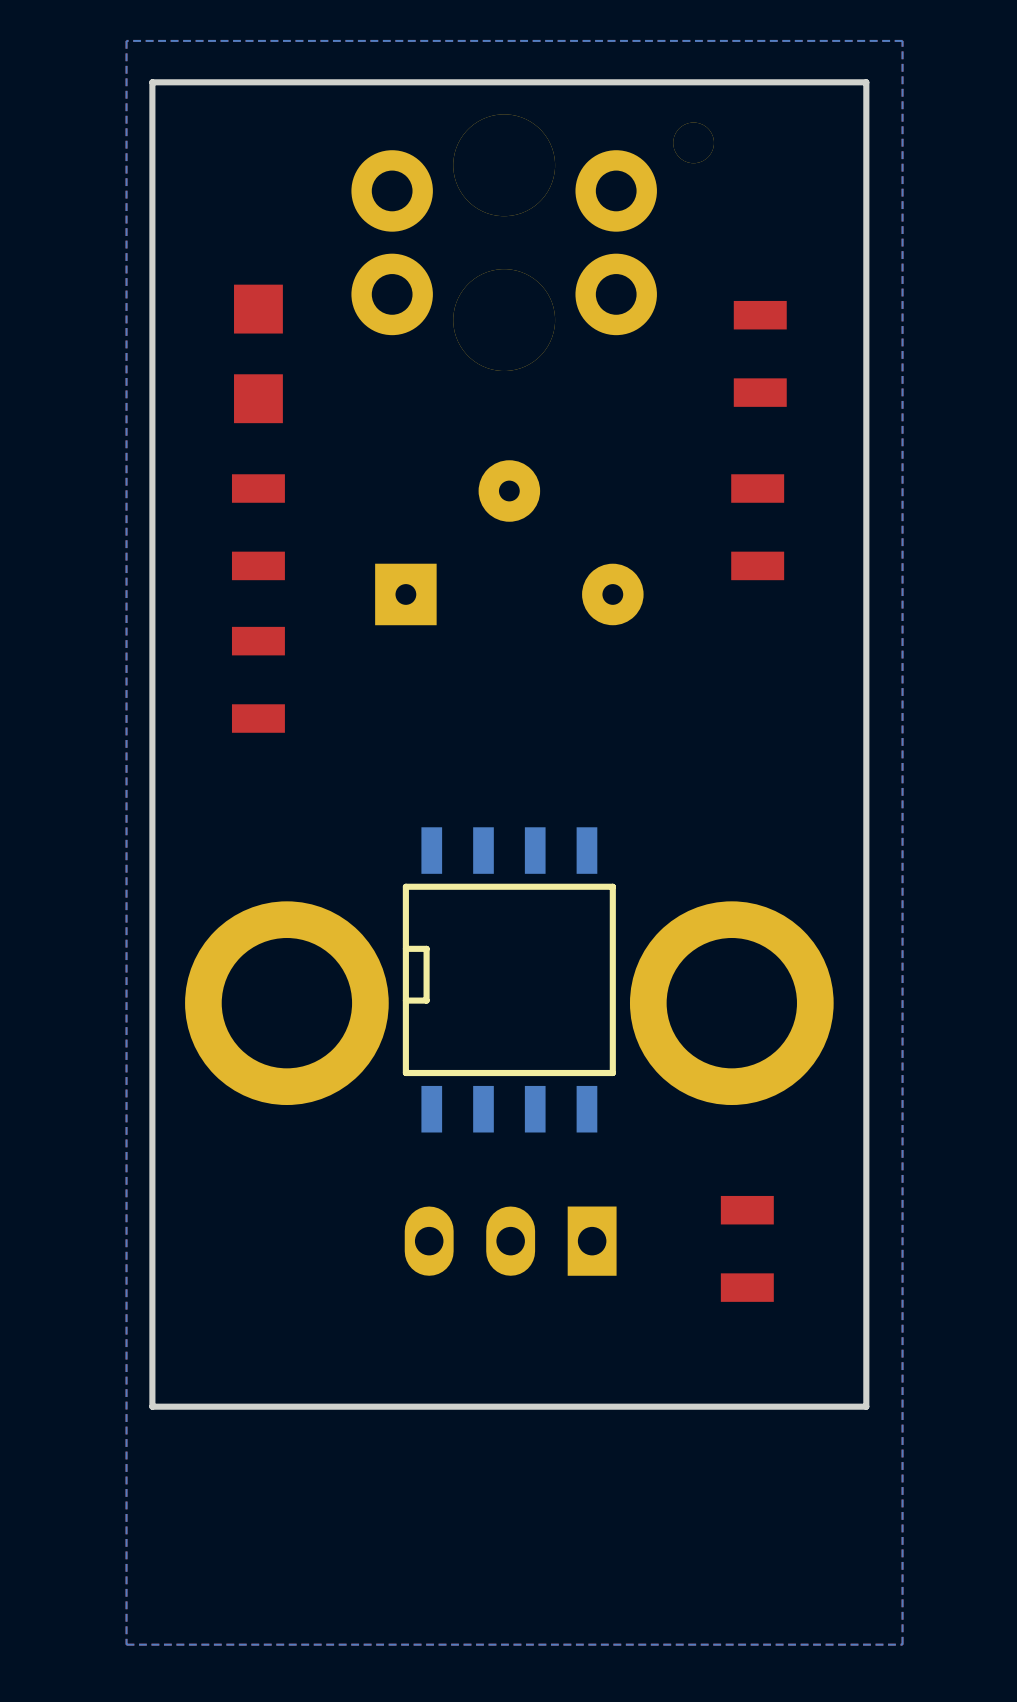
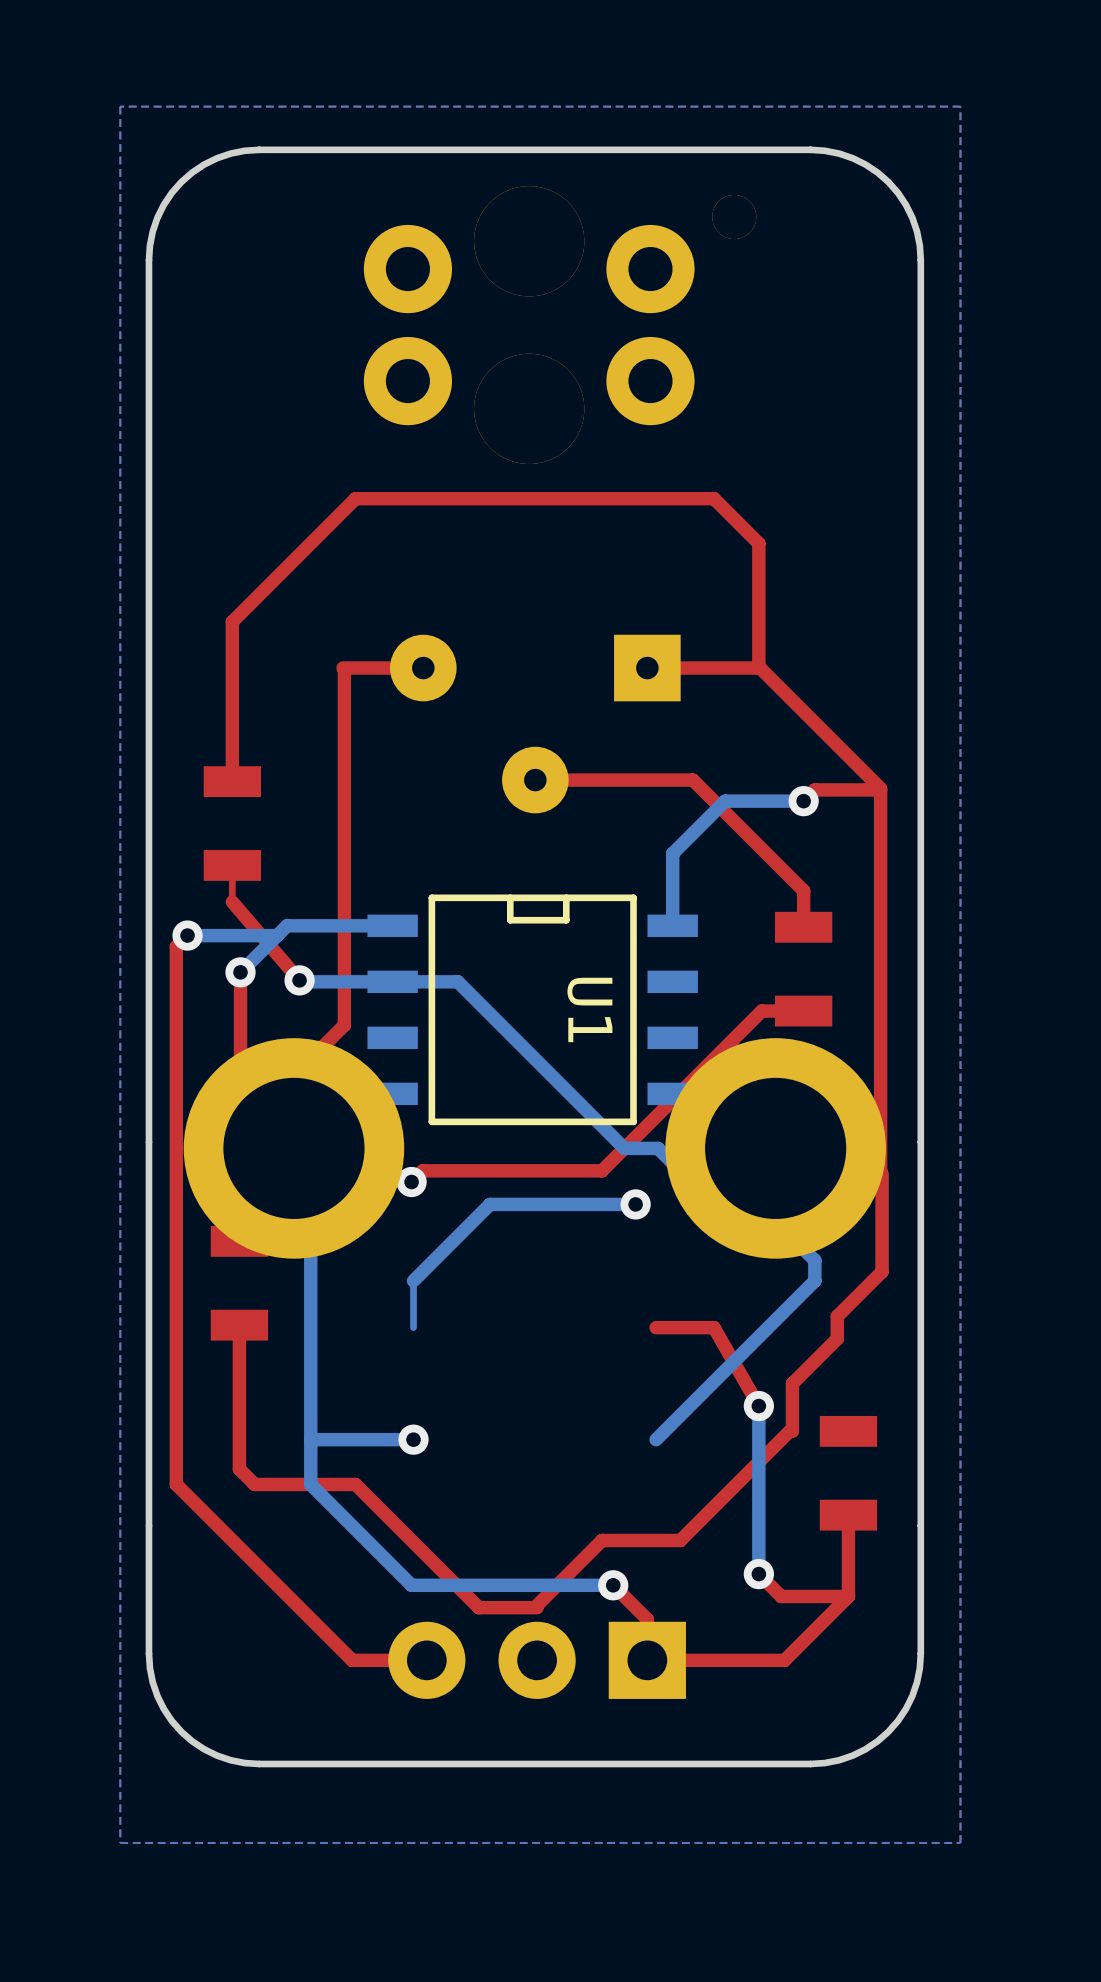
board edge: (866, 82) (866, 1406) (152, 1406) (152, 82) (866, 82) -> (810, 149) (839, 153) (852, 158) (877, 172) (898, 192) (906, 204) (912, 217) (919, 245) (920, 1653) (919, 1668) (912, 1695) (898, 1720) (877, 1741) (852, 1755) (824, 1763) (259, 1764) (244, 1763) (217, 1755) (192, 1741) (171, 1720) (157, 1695) (149, 1668) (148, 1653) (148, 260) (149, 245) (157, 217) (171, 192) (192, 172) (217, 158) (244, 150) (810, 149)
part: (258, 353) -> none
part: (760, 353) -> none
part: (258, 527) -> none
part: (757, 527) -> none
part rotation: 0° (509, 542) -> 180° (535, 724)
top track: none -> (423, 668) (343, 668) (344, 1025) (310, 1058) (310, 1159) (333, 1182) (377, 1137)
top track: none -> (758, 668) (758, 543) (714, 498) (355, 498) (232, 621) (232, 781)
top track: none -> (758, 668) (647, 668)
top track: none -> (758, 668) (880, 789)
top track: none -> (535, 780) (692, 780) (803, 890) (803, 927)
top track: none -> (880, 789) (814, 789) (803, 801)
top track: none -> (880, 789) (880, 1172)
part position: (258, 679) -> (232, 823)
bottom track: none -> (803, 801) (725, 801) (672, 853) (672, 925)
via: none -> (803, 801)
top track: none -> (232, 865) (232, 901) (299, 980)
bottom track: none -> (392, 925) (287, 925) (240, 972)
top track: none -> (187, 935) (176, 946) (176, 1484) (352, 1660) (426, 1660)
via: none -> (187, 935)
bottom track: none -> (277, 935) (187, 935)
part: none -> (803, 969)
top track: none -> (240, 972) (240, 1062)
via: none -> (240, 972)
bottom track: none -> (299, 980) (457, 981) (624, 1148) (658, 1148) (736, 1226) (781, 1226) (814, 1260) (814, 1280) (656, 1439)
via: none -> (299, 980)
U1: none -> (532, 1009)
top track: none -> (803, 1011) (761, 1011) (602, 1170) (422, 1170) (411, 1182)
part: (509, 979) -> none
top track: none -> (880, 1172) (882, 1271) (837, 1316) (837, 1338) (792, 1383) (792, 1431) (789, 1431) (680, 1540) (602, 1540) (537, 1605) (537, 1607) (478, 1607) (355, 1484) (254, 1484) (239, 1469) (239, 1325)
via: none -> (411, 1182)
bottom track: none -> (333, 1204) (310, 1226) (310, 1484) (411, 1585) (613, 1585)
bottom track: none -> (635, 1204) (490, 1204) (413, 1280) (413, 1327)
via: none -> (635, 1204)
part: none -> (239, 1283)
top track: none -> (656, 1327) (714, 1327) (758, 1406)
part: (510, 1241) -> none
bottom track: none -> (758, 1406) (758, 1574)
via: none -> (758, 1406)
part position: (747, 1248) -> (848, 1473)
bottom track: none -> (413, 1439) (310, 1439)
via: none -> (413, 1439)
top track: none -> (848, 1515) (848, 1596)
top track: none -> (758, 1574) (781, 1596) (848, 1596)
via: none -> (758, 1574)
top track: none -> (613, 1585) (647, 1619) (647, 1660) (784, 1660) (848, 1596)
via: none -> (613, 1585)
part: none -> (537, 1660)

